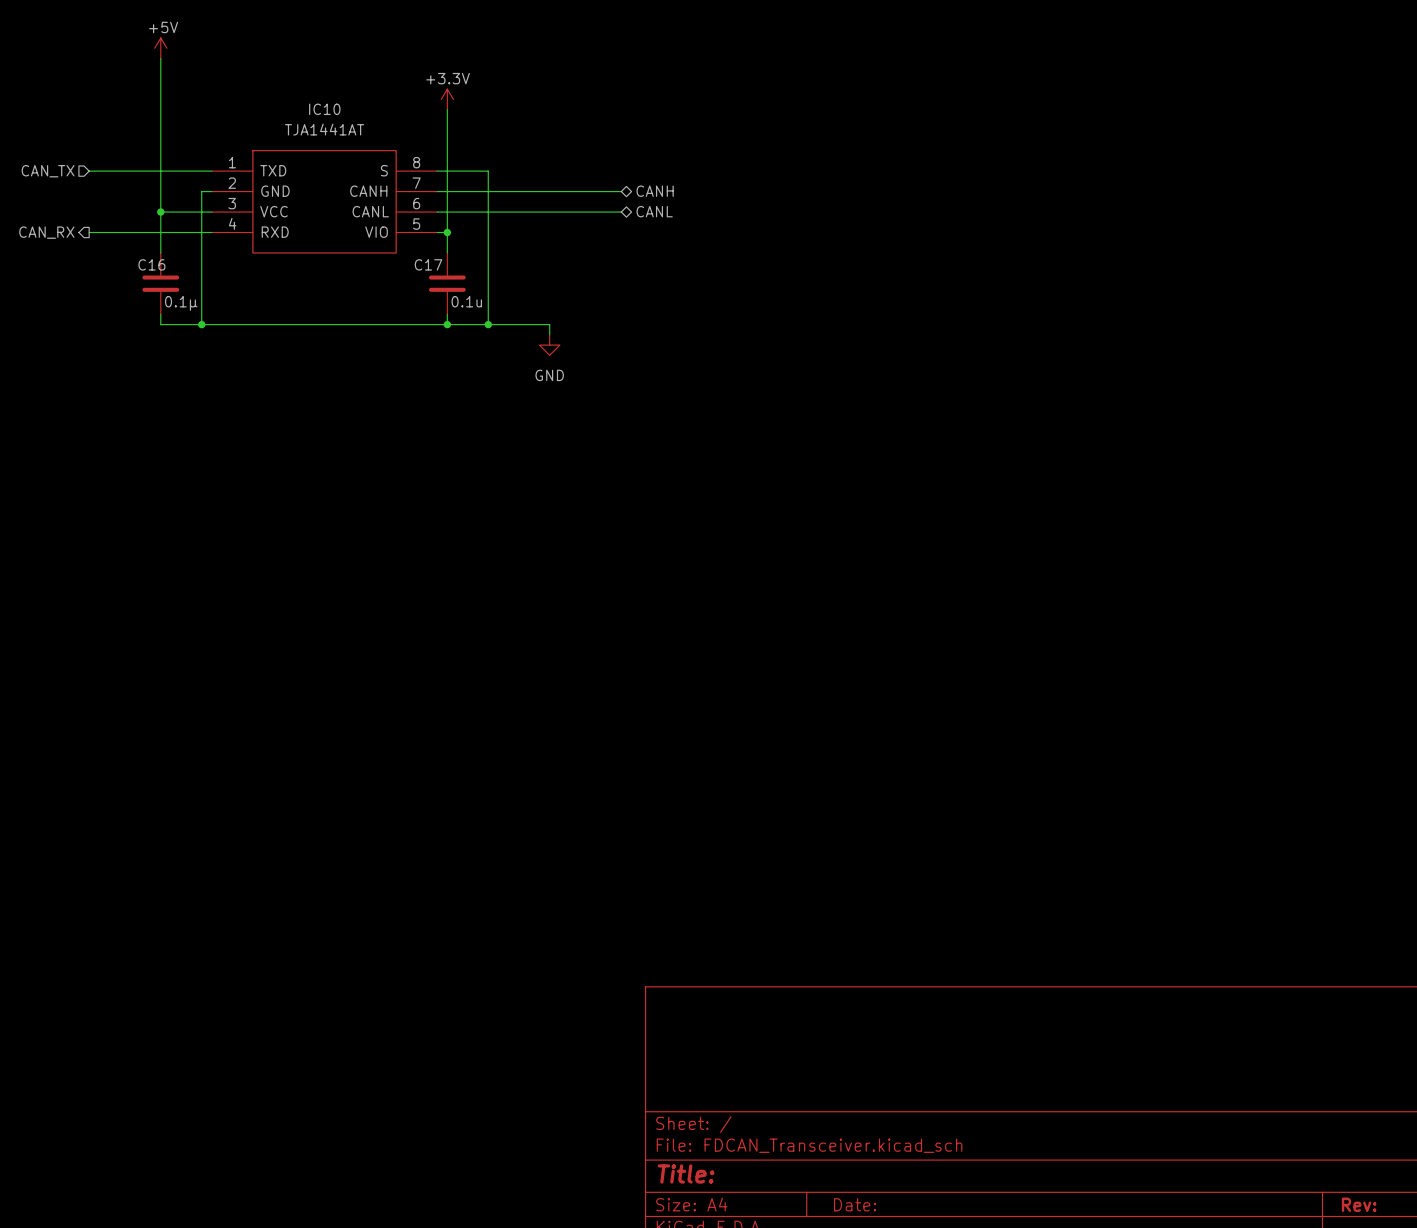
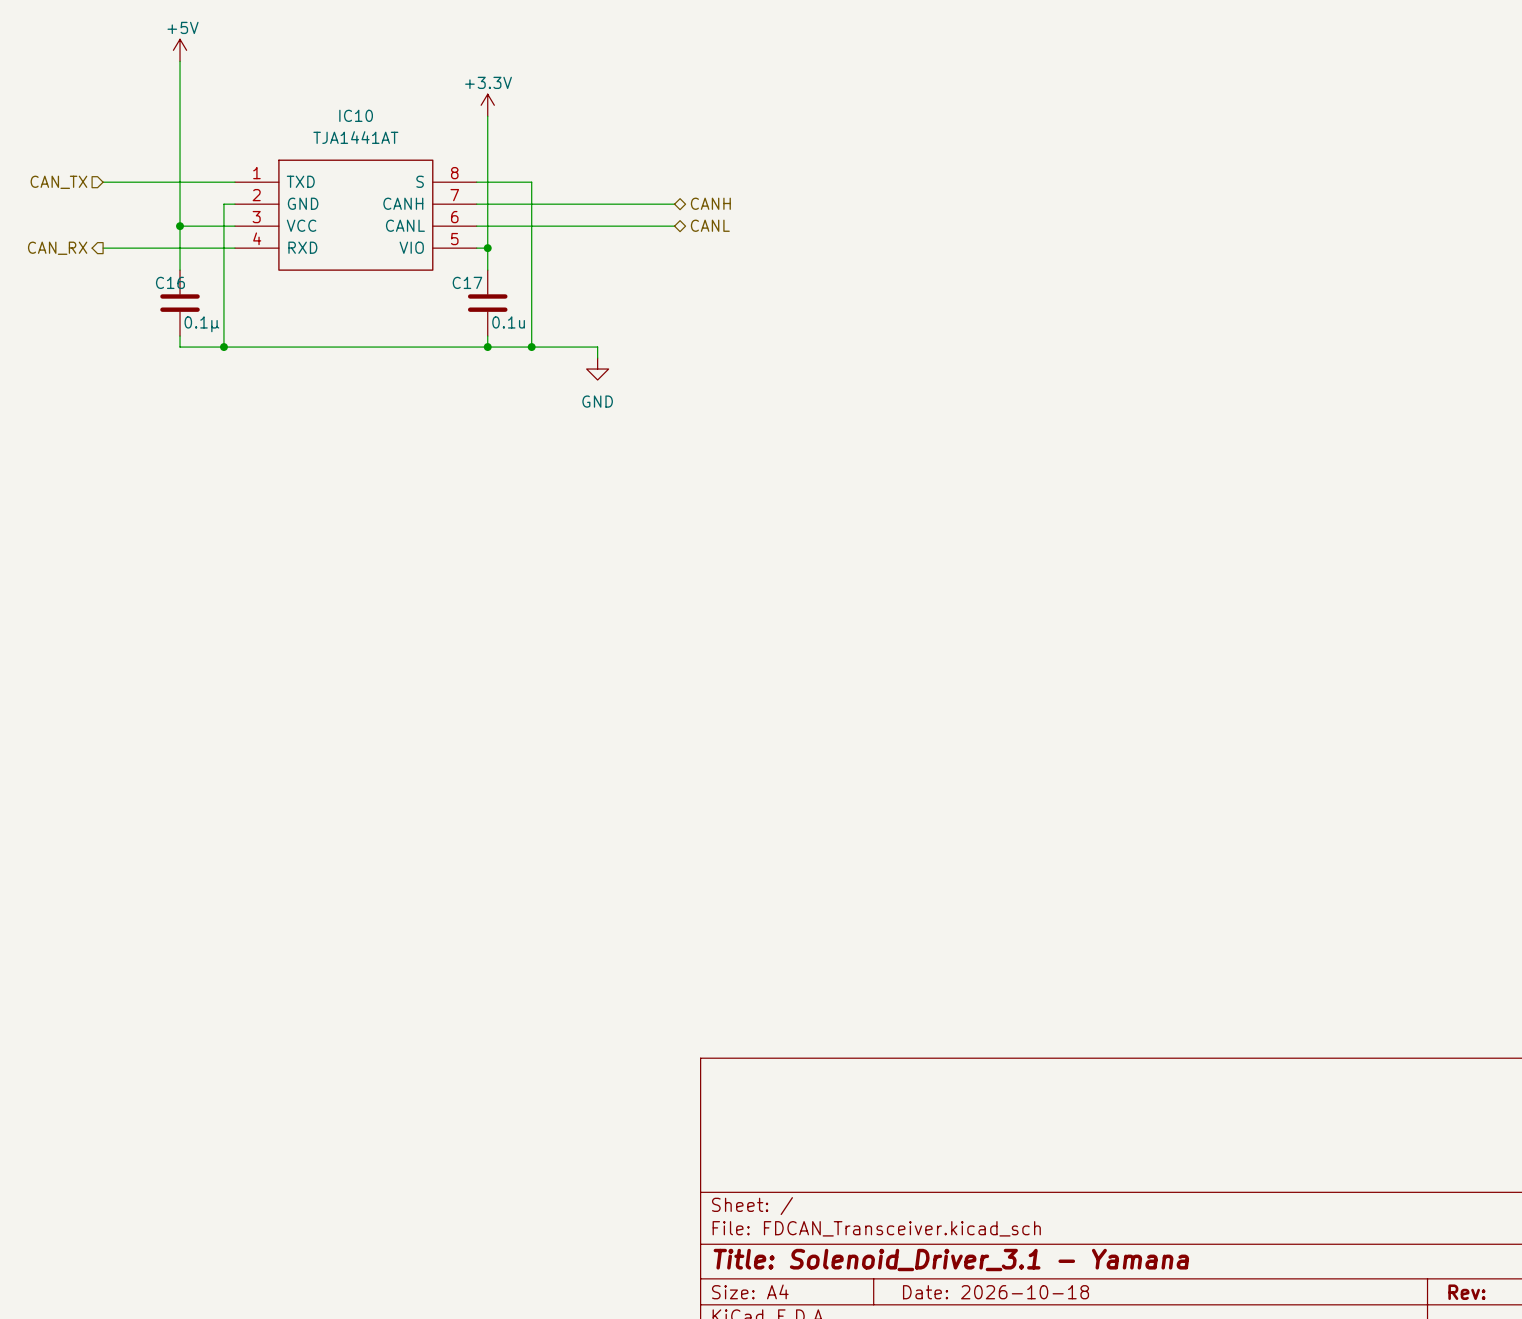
title block: Title: (686, 1173) -> Title: Solenoid_Driver_3.1 - Yamana (951, 1260)
title block: Date: (855, 1204) -> Date: 2026-10-18 (996, 1292)

